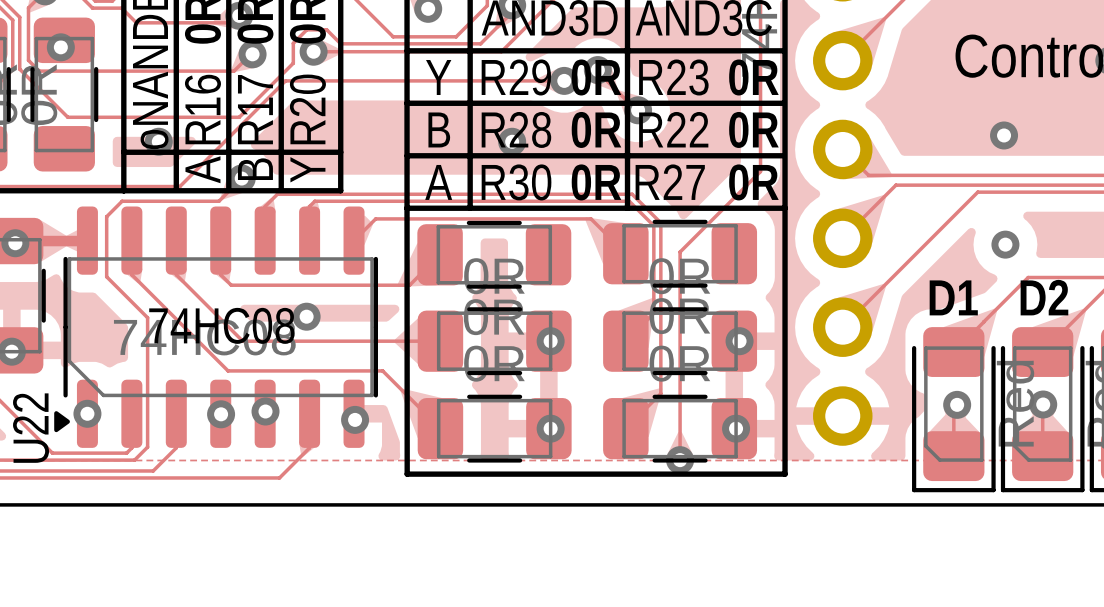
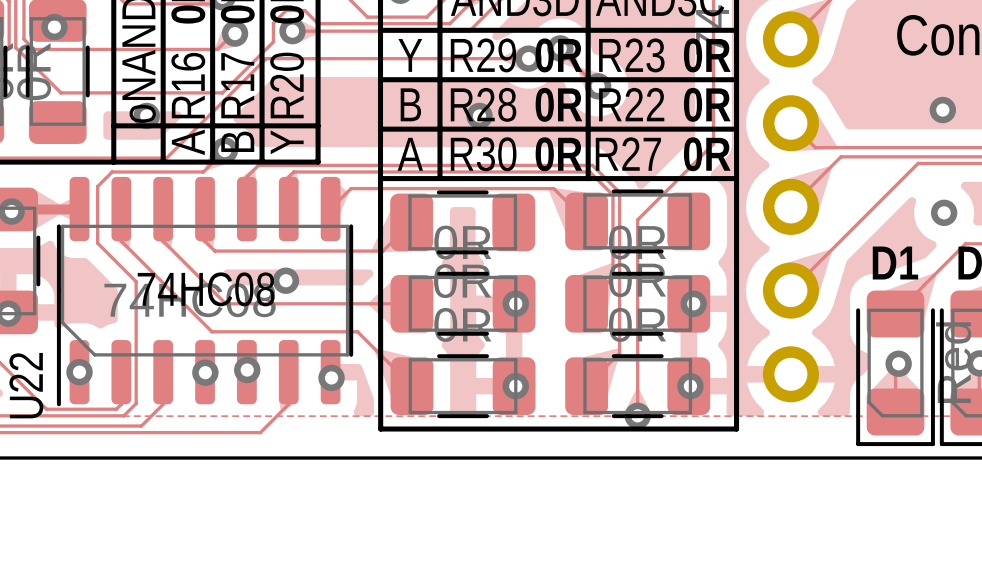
U22 footprint: [54, 206, 378, 448] -> [56, 176, 354, 407]

